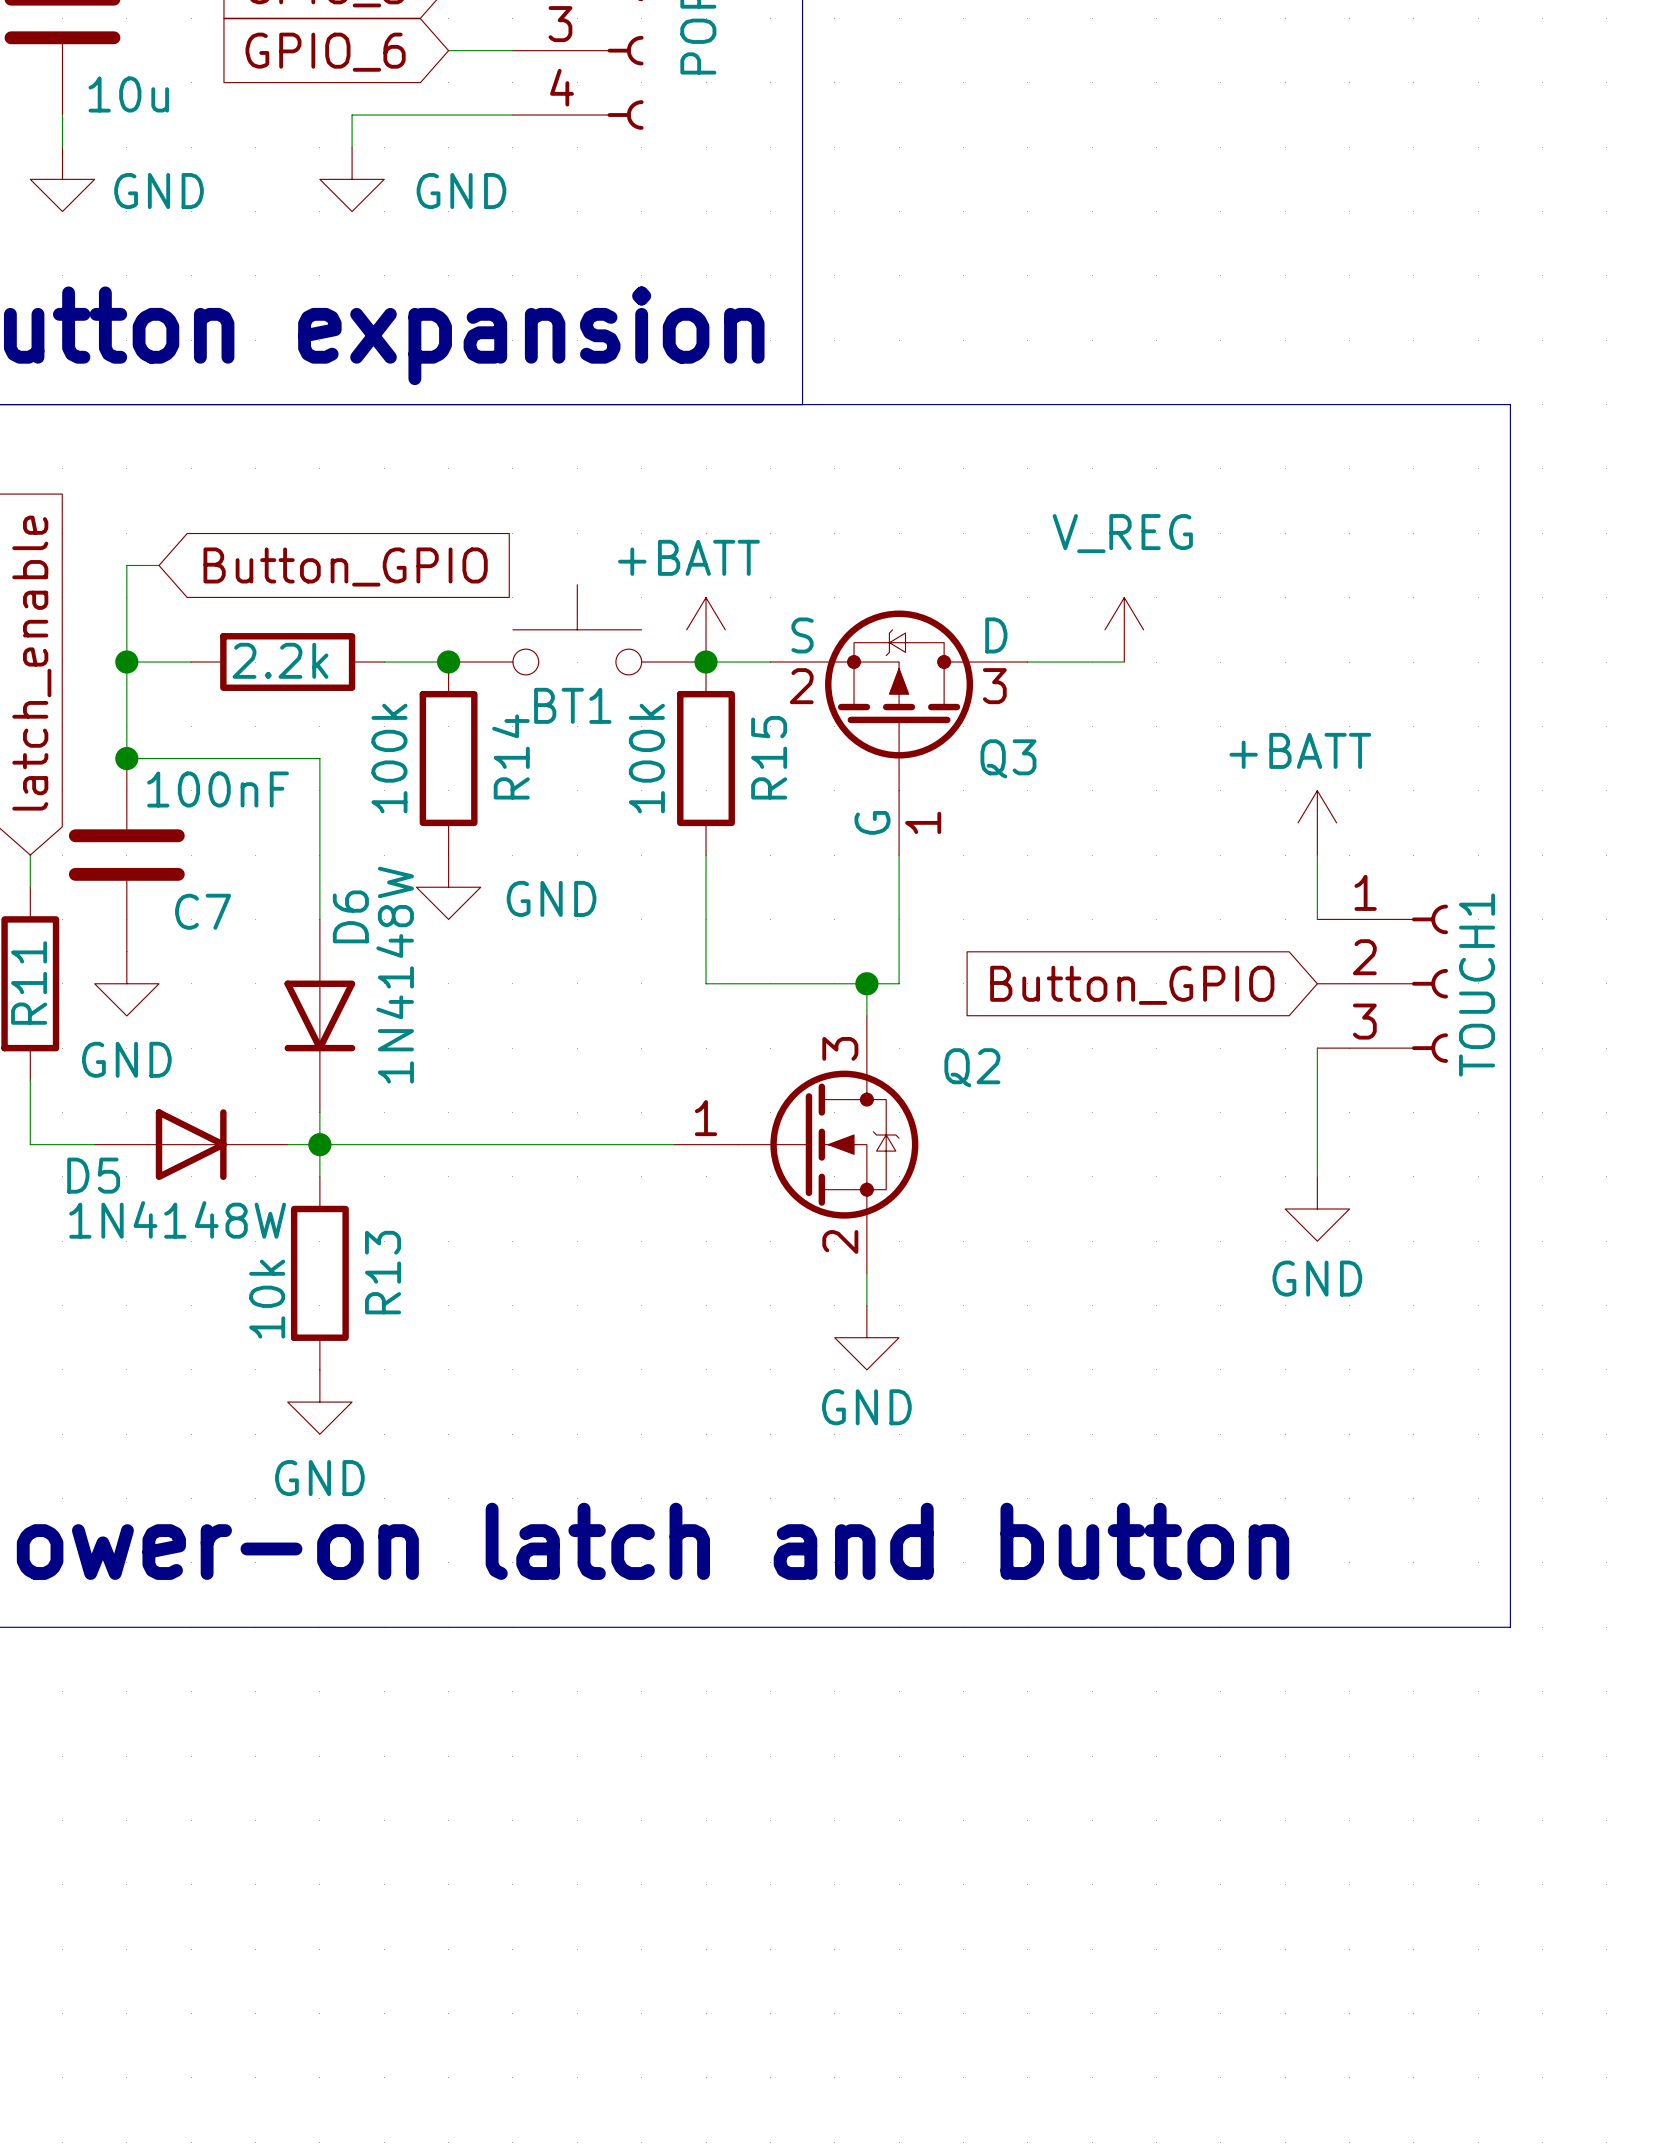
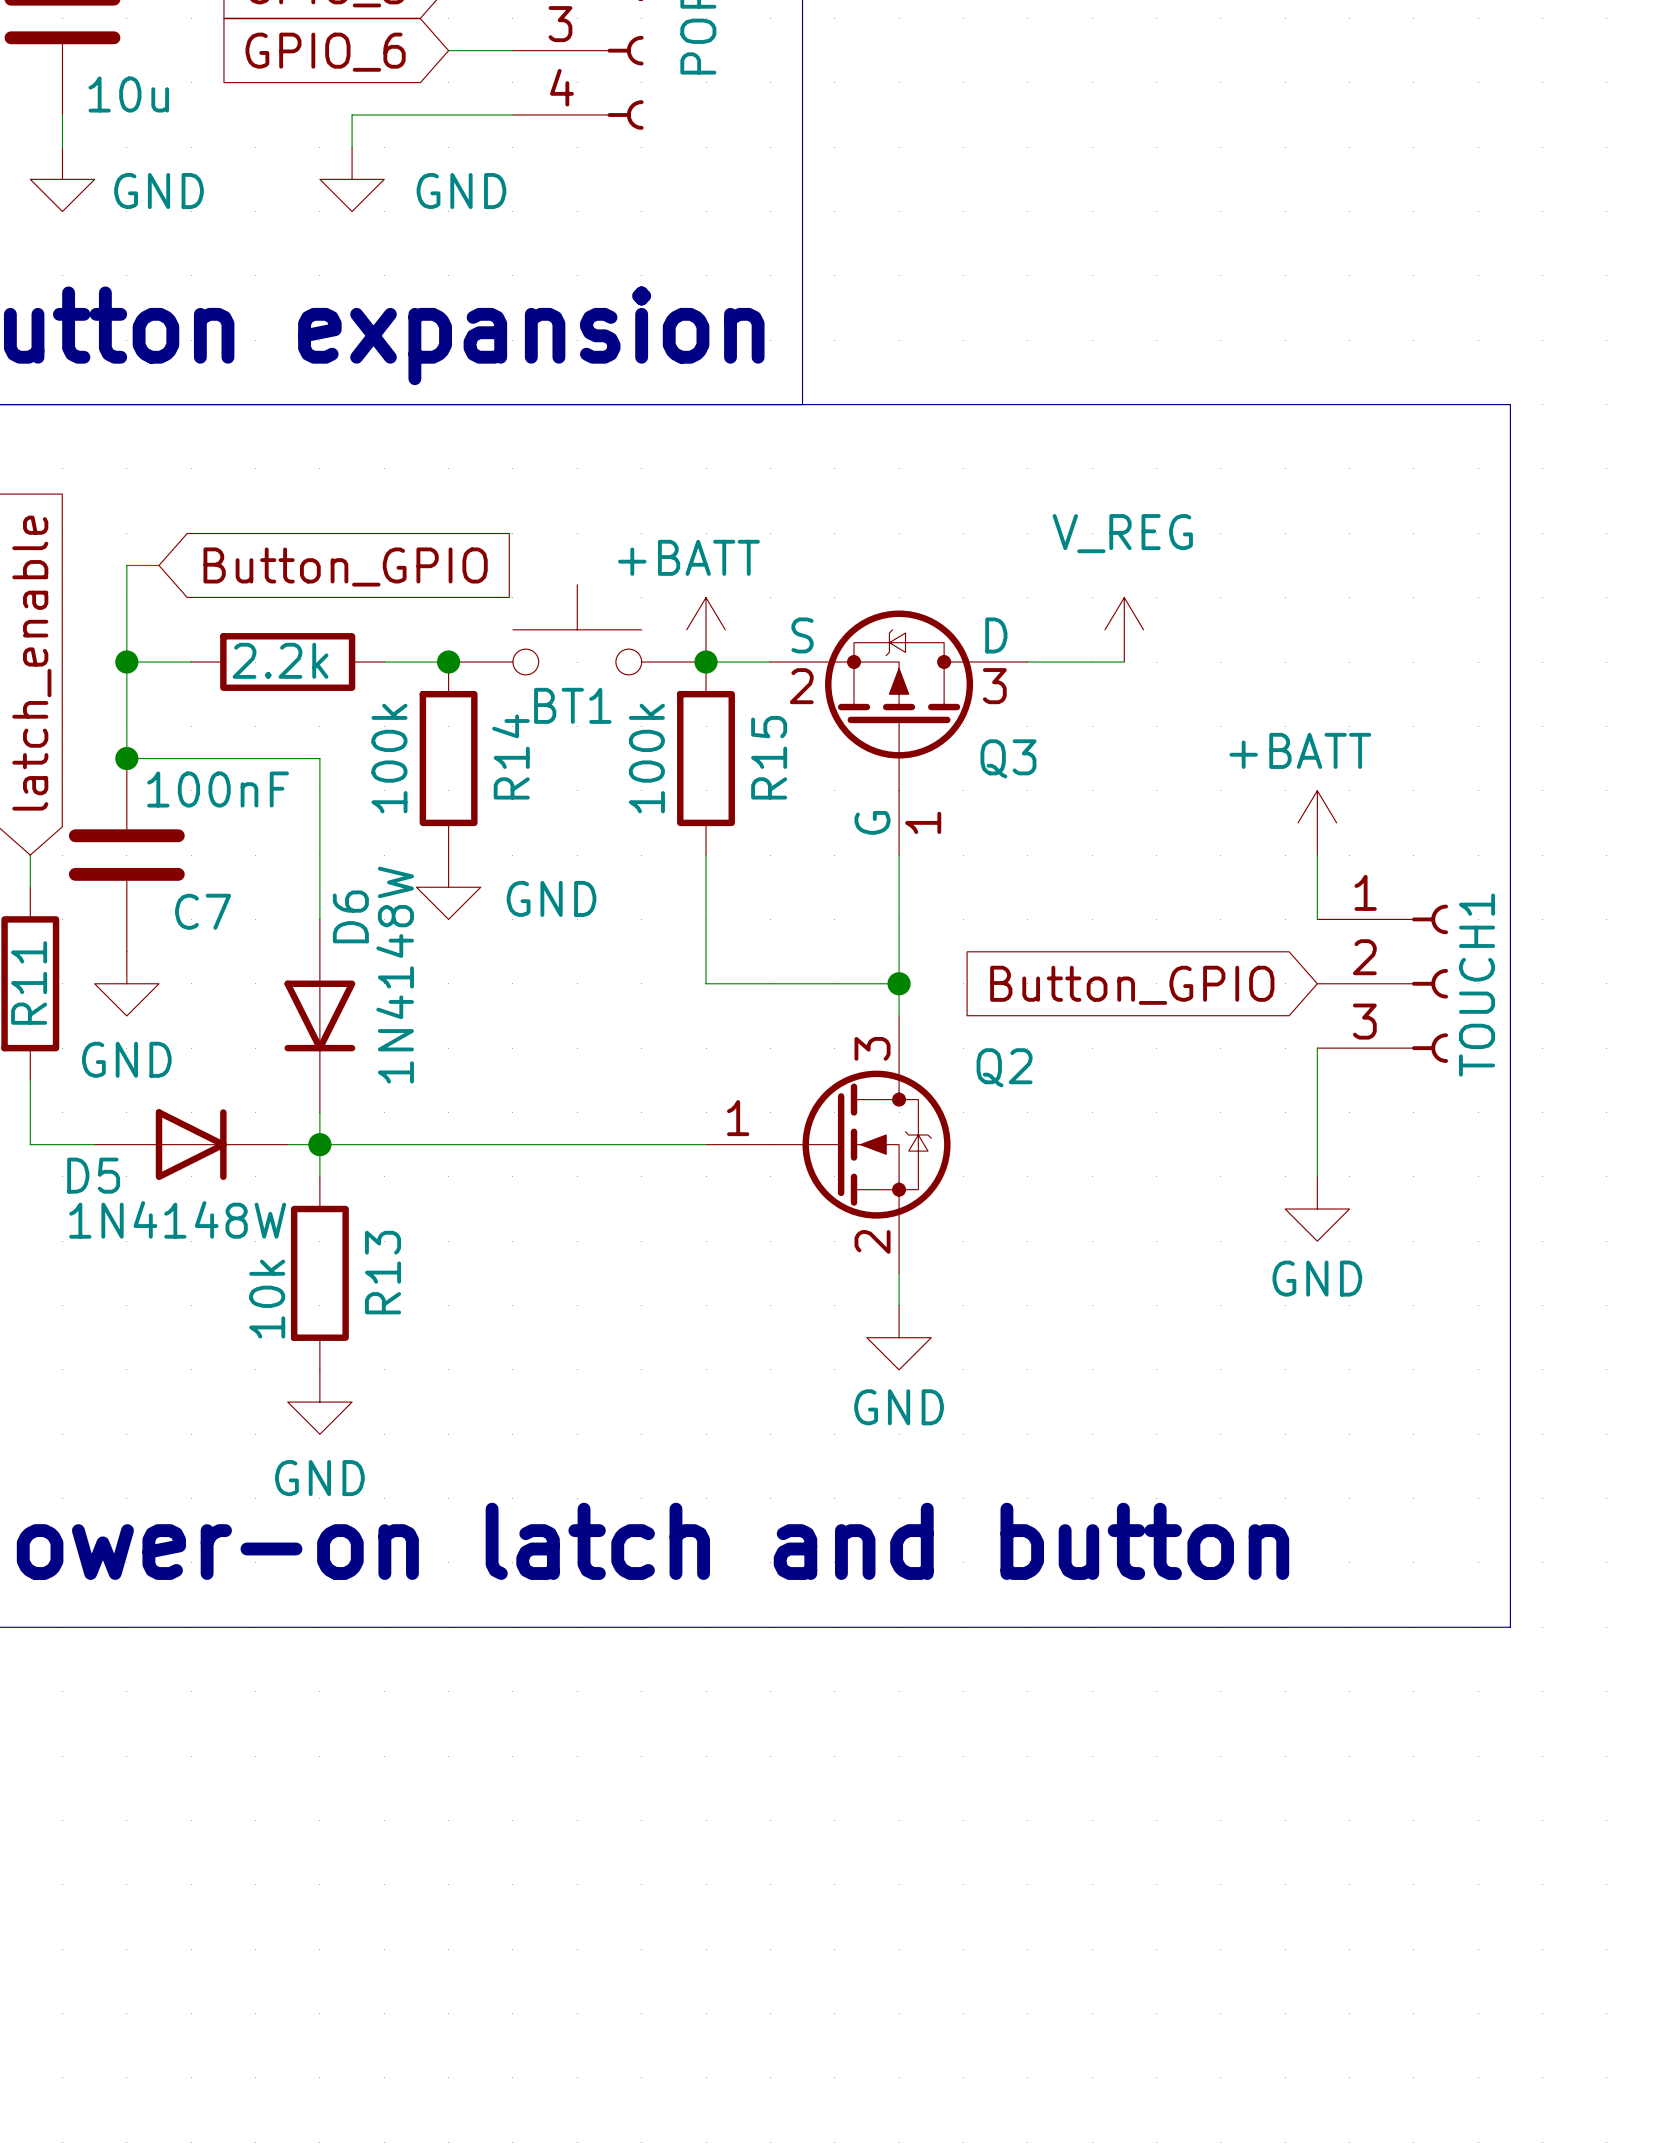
wire: (866, 983) (866, 1015) -> (899, 983) (899, 1015)
junction position: (866, 983) -> (899, 983)
Q2 position: (796, 1144) -> (828, 1144)
wire: (866, 1273) (866, 1305) -> (899, 1273) (899, 1305)
power symbol position: GND (866, 1337) -> GND (899, 1337)

